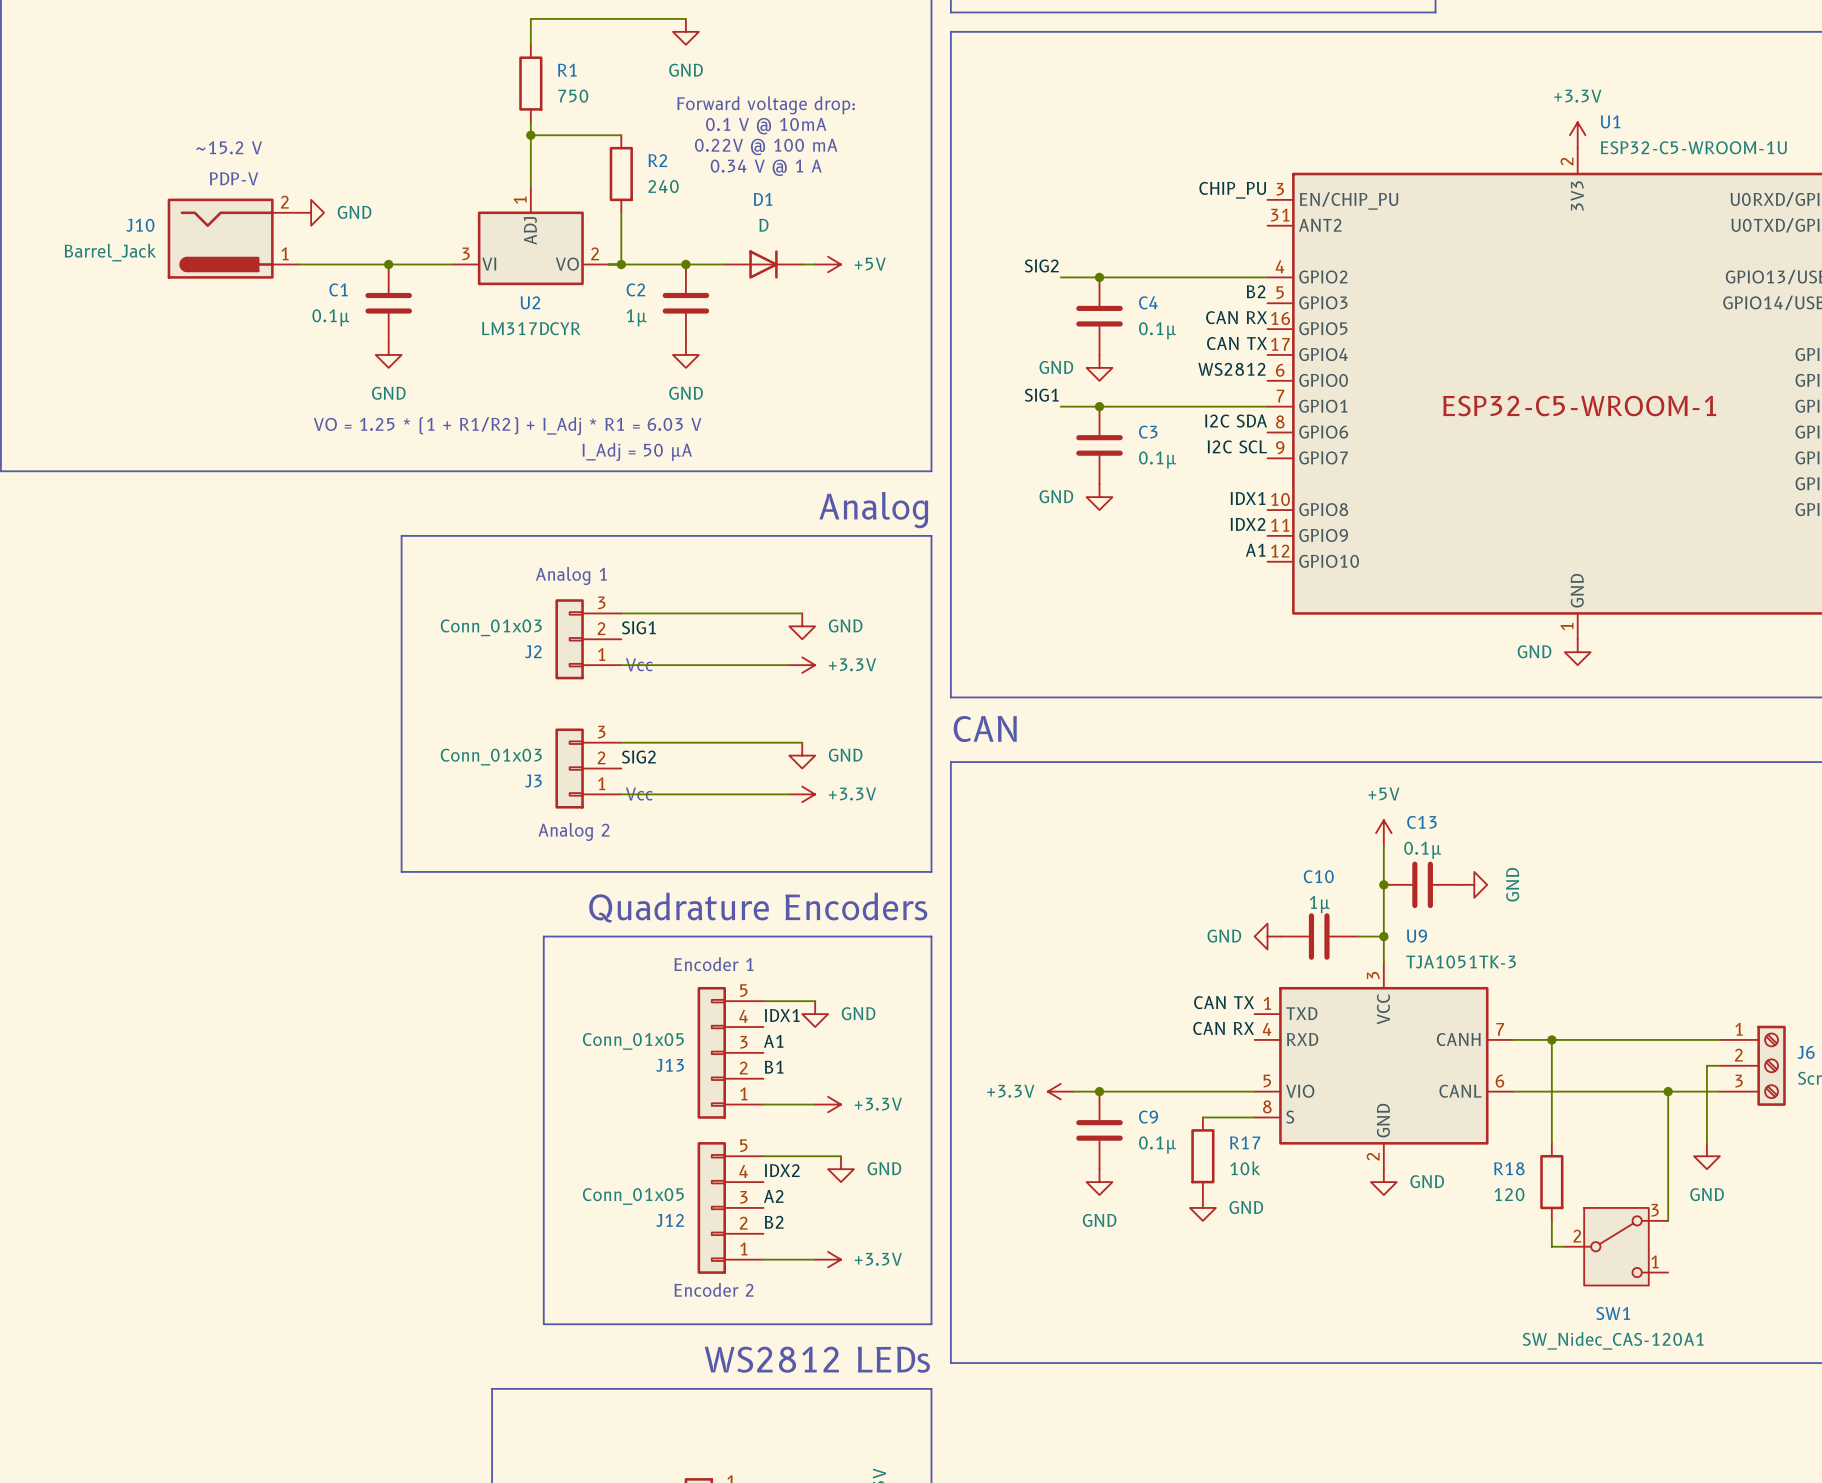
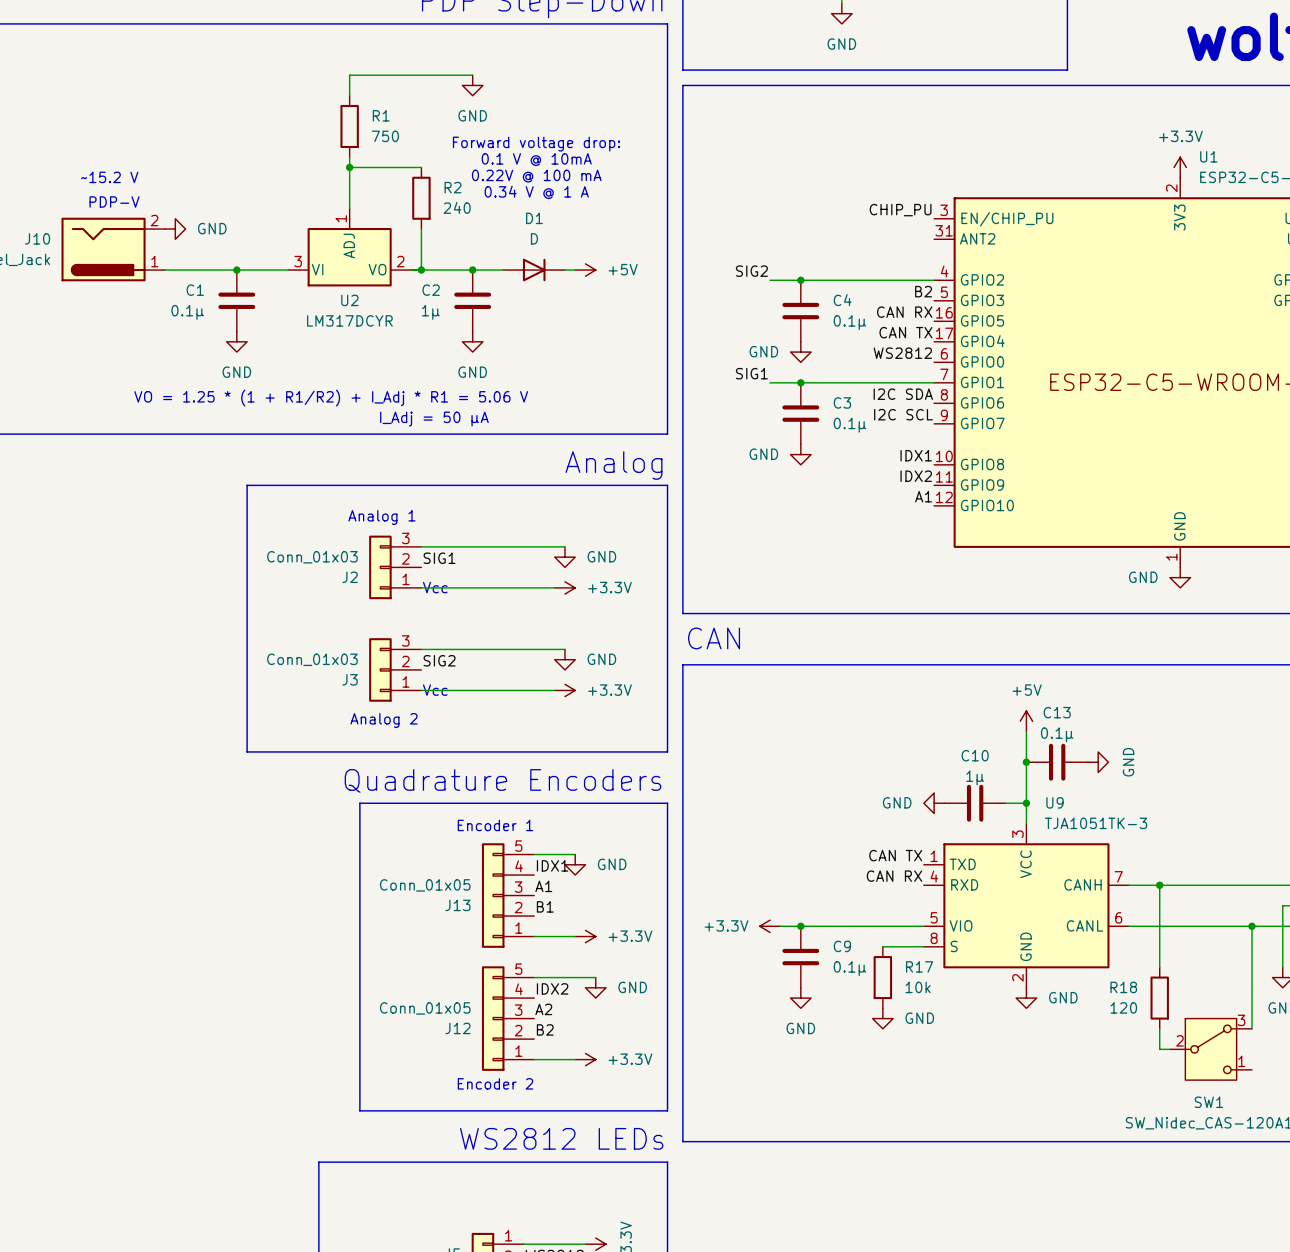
text: VO = 1.25 * (1 + R1/R2) + I_Adj * R1 = 6.03 V (507, 426) -> VO = 1.25 * (1 + R1/R2) + I_Adj * R1 = 5.06 V (331, 398)

